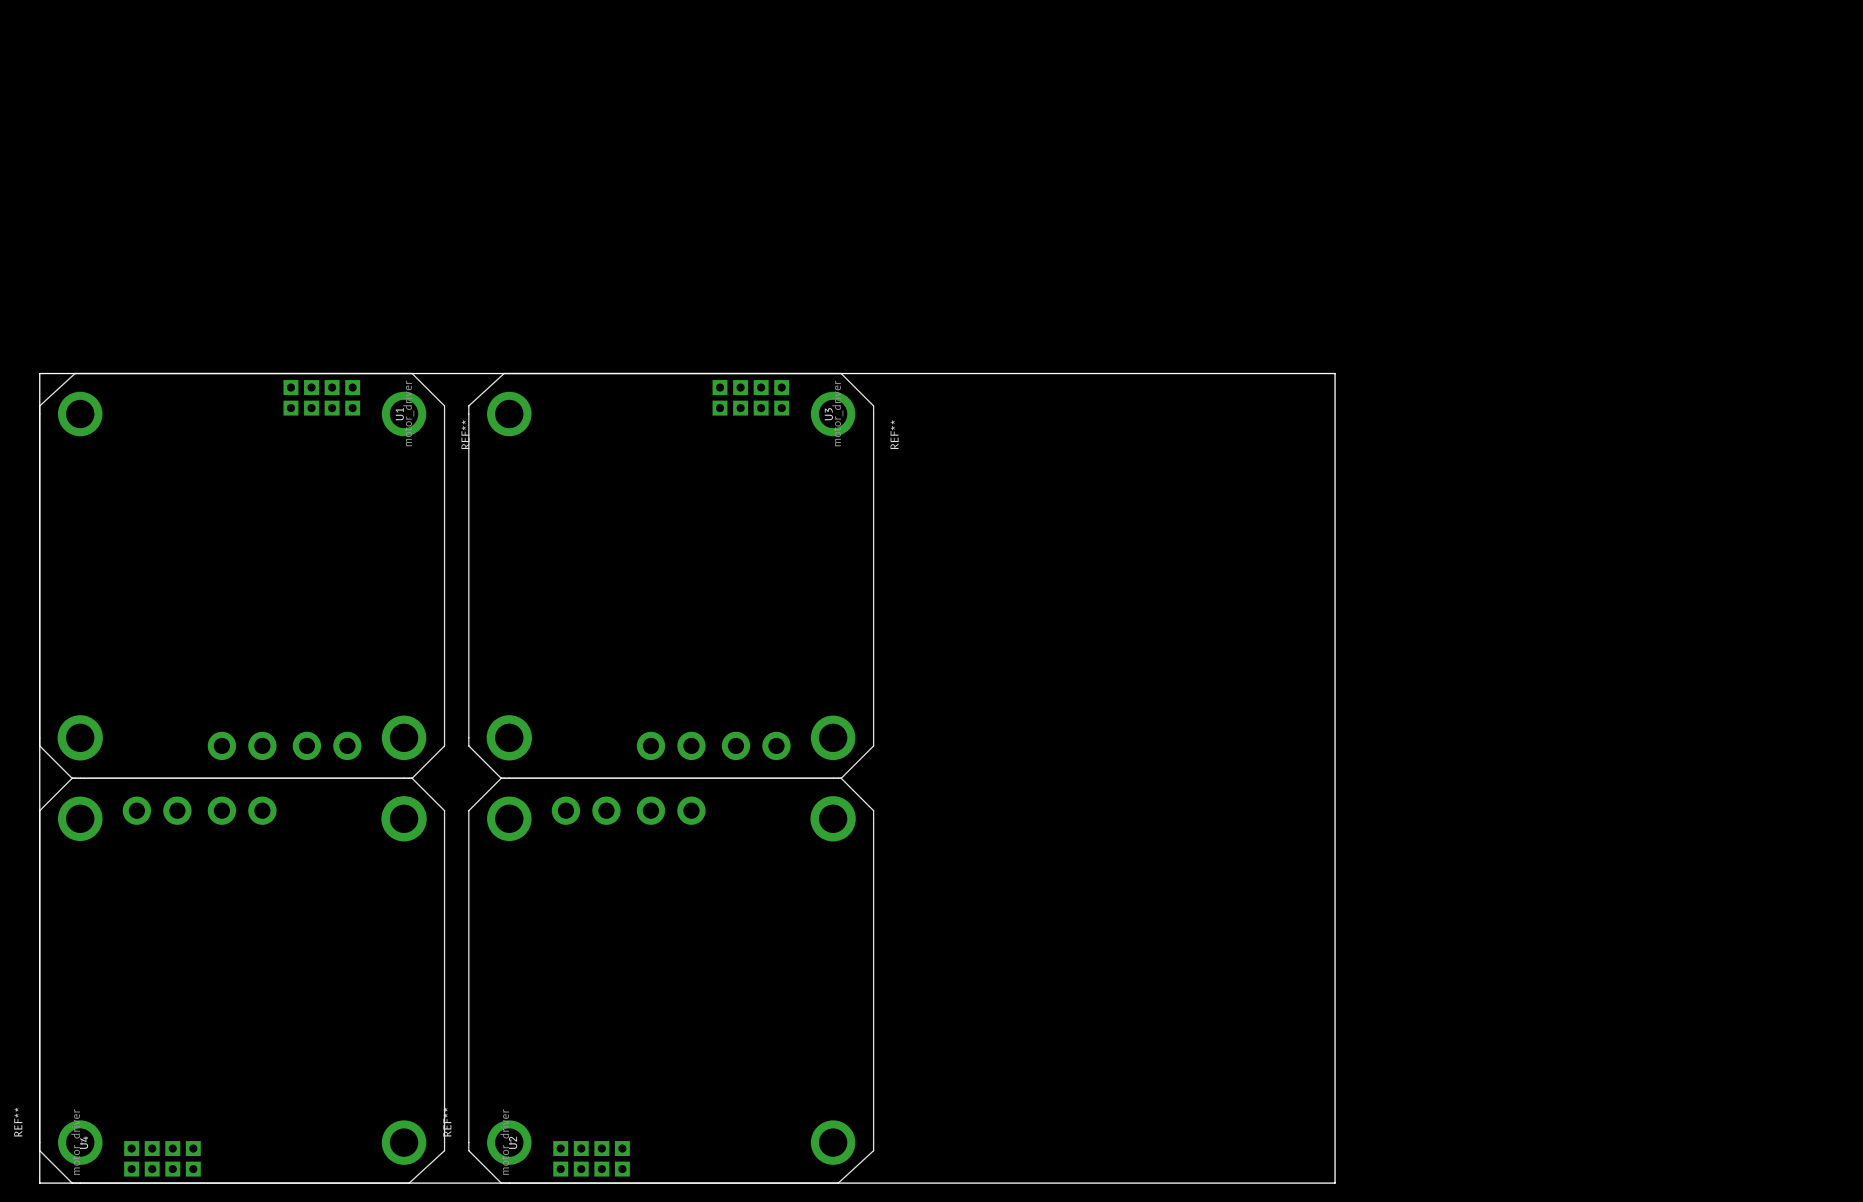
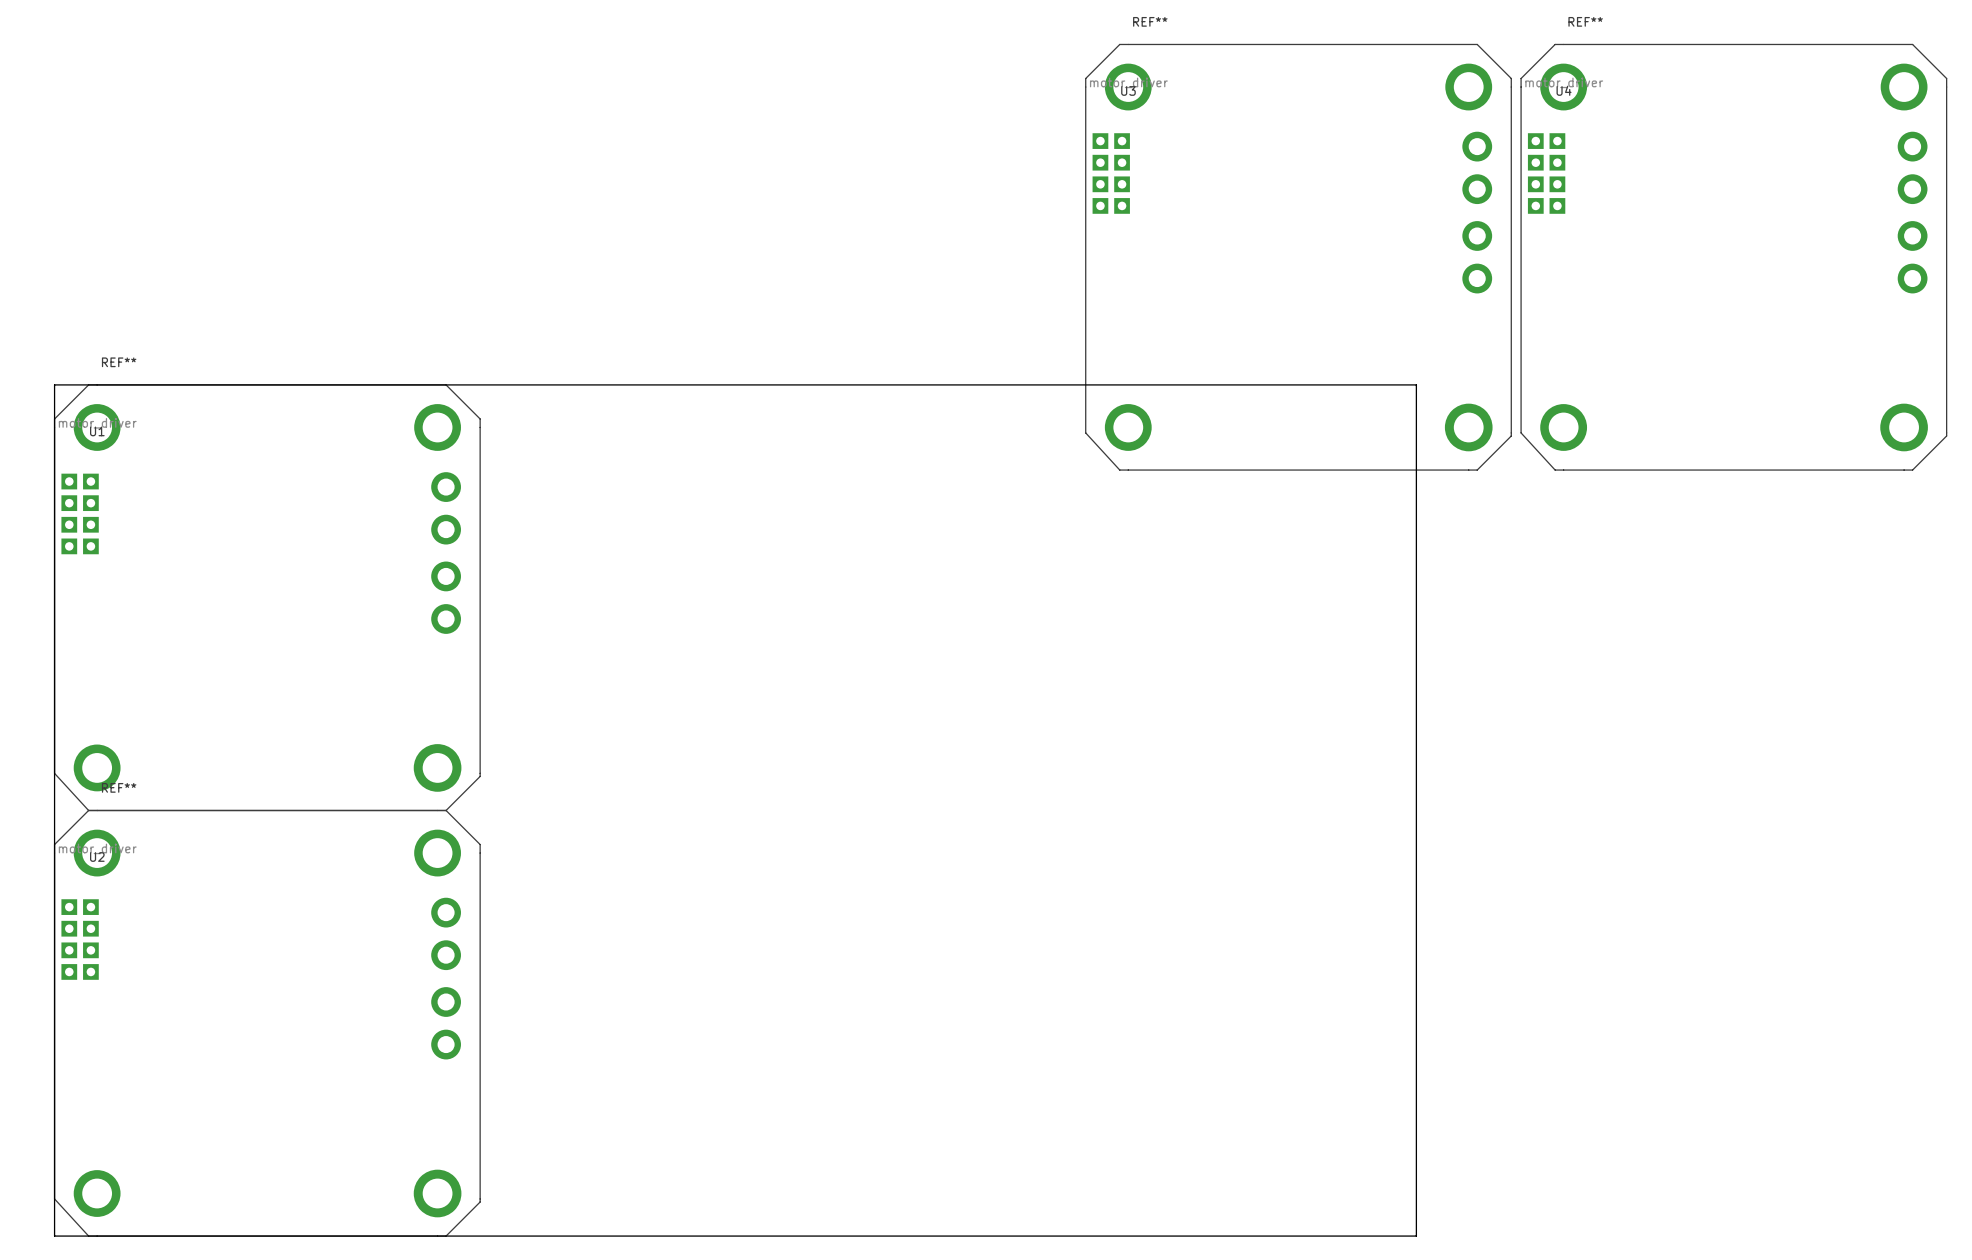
U1 rotation: 0° (242, 575) -> 90° counterclockwise (267, 597)
U3 rotation: 0° (671, 575) -> 90° counterclockwise (1298, 257)
U3 position: (671, 575) -> (1298, 257)
U4 rotation: 0° (242, 980) -> 90° clockwise (1733, 257)
U4 position: (242, 980) -> (1733, 257)
U2 rotation: 0° (671, 980) -> 90° clockwise (267, 1023)
U2 position: (671, 980) -> (267, 1023)

